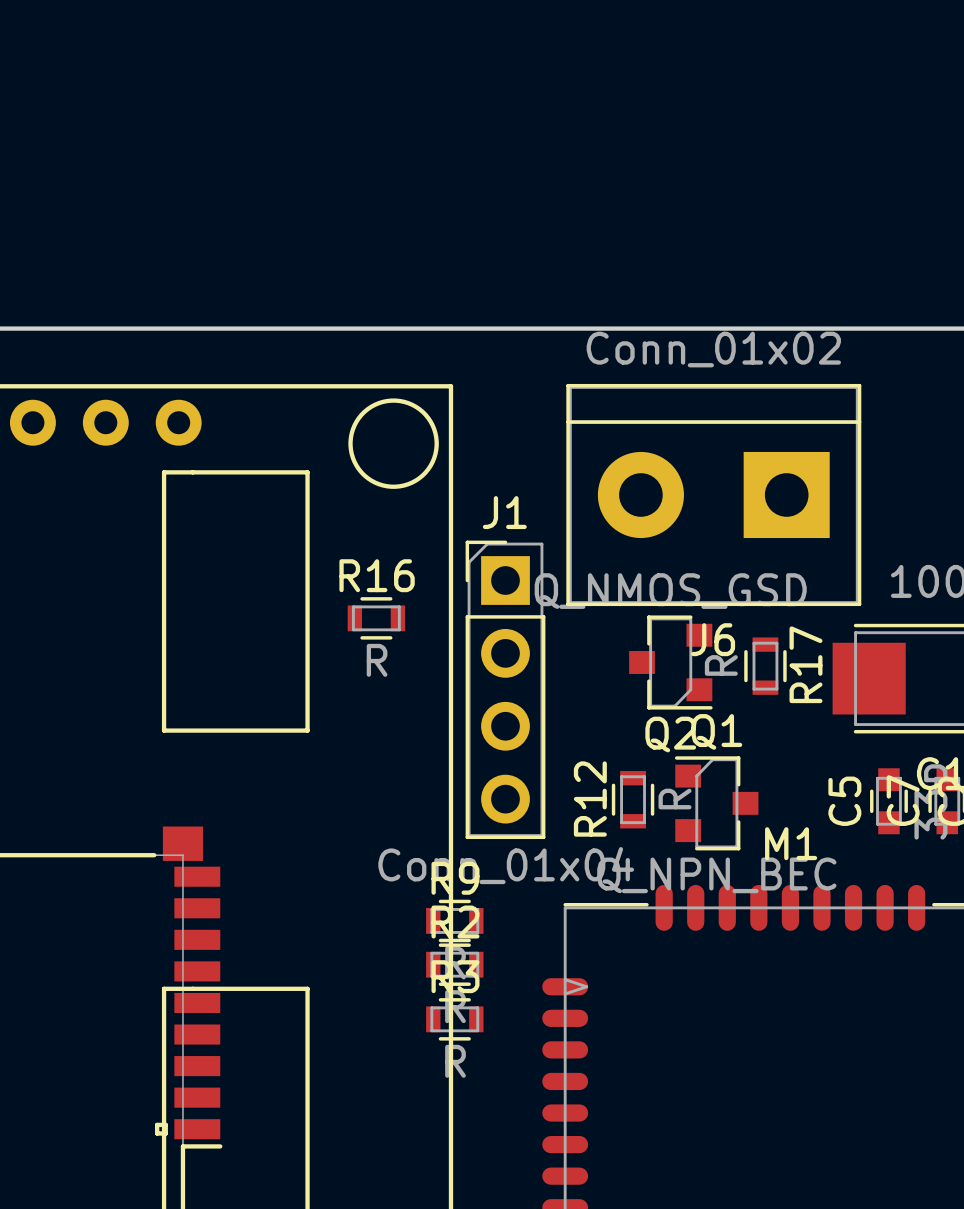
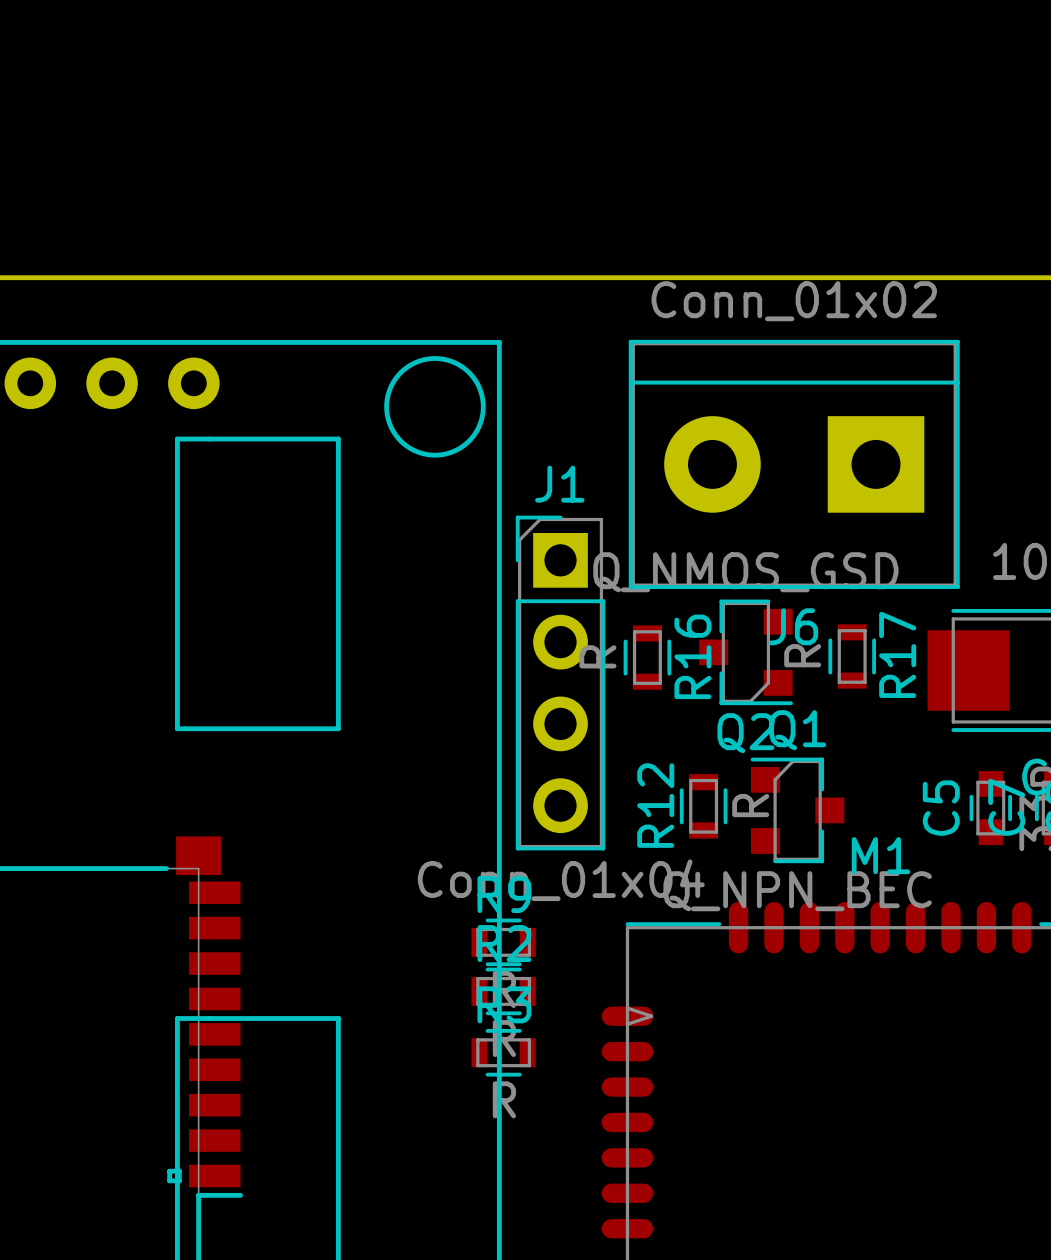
R16 rotation: 0° (376, 618) -> 90° clockwise (647, 657)
R16 position: (376, 618) -> (647, 657)

